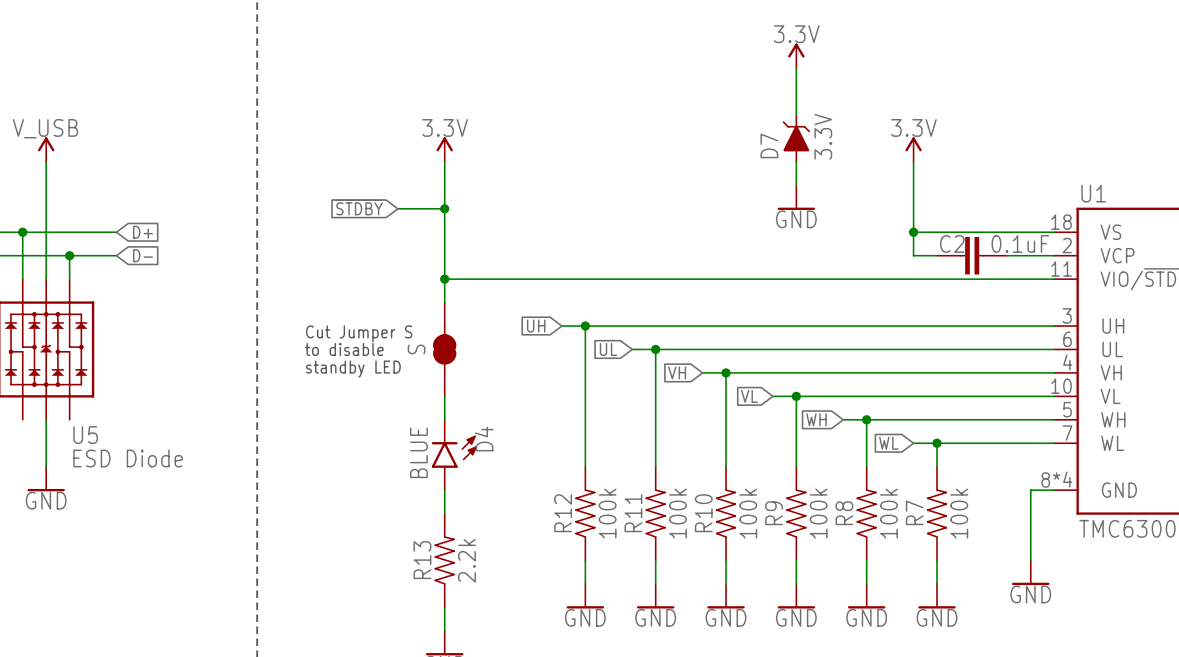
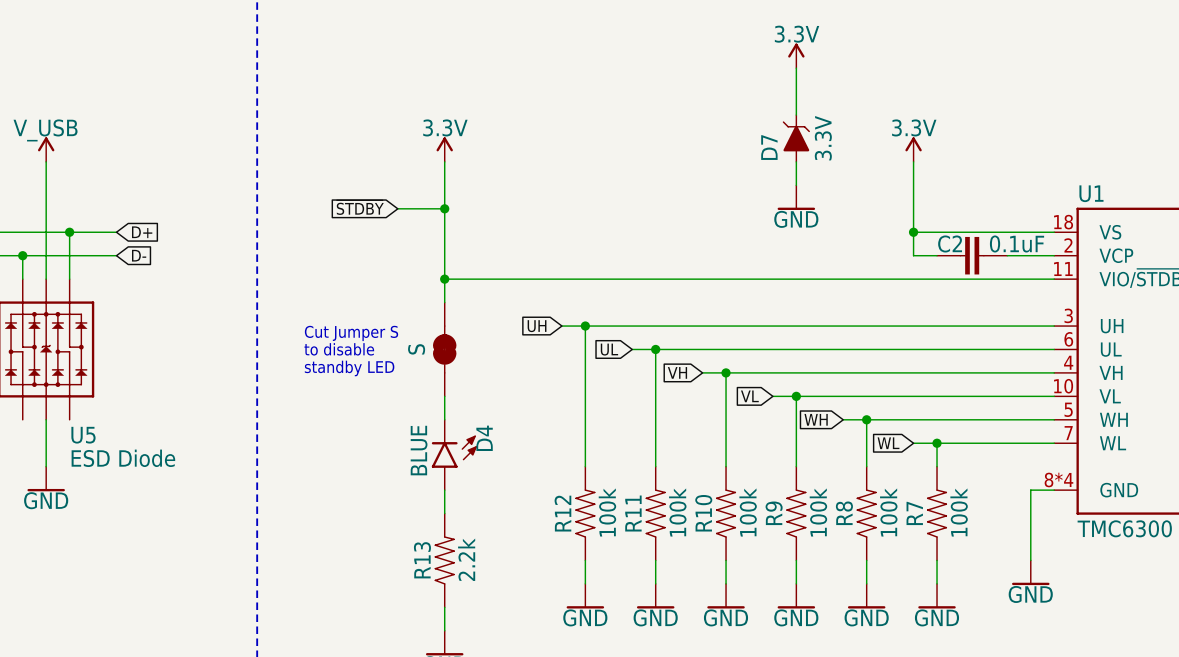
wire: (22, 232) (22, 255) -> (69, 232) (69, 255)
junction: (22, 232) -> none
junction: none -> (69, 232)
junction: none -> (22, 255)
junction: (69, 255) -> none

